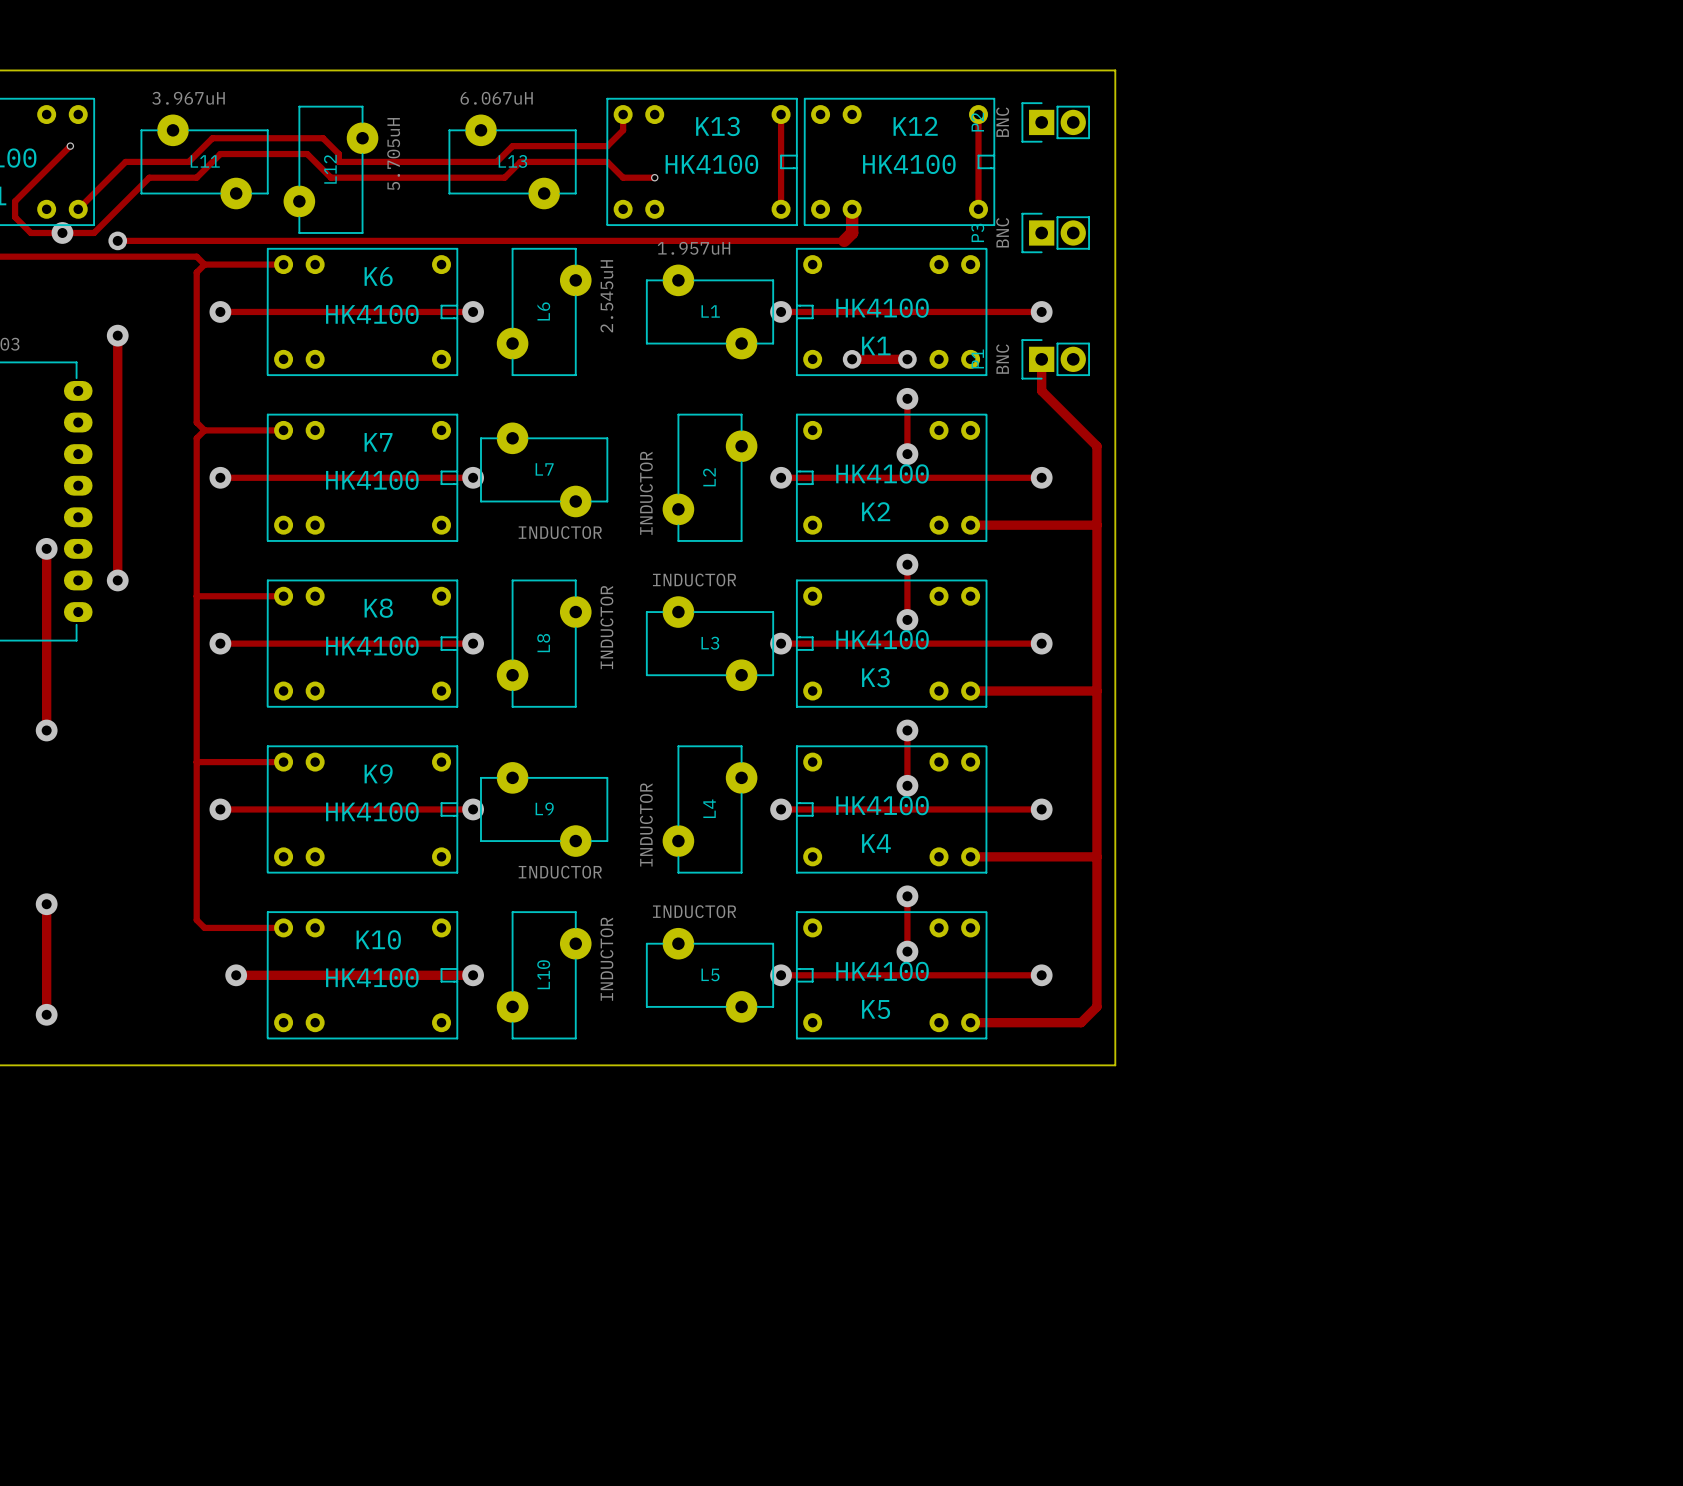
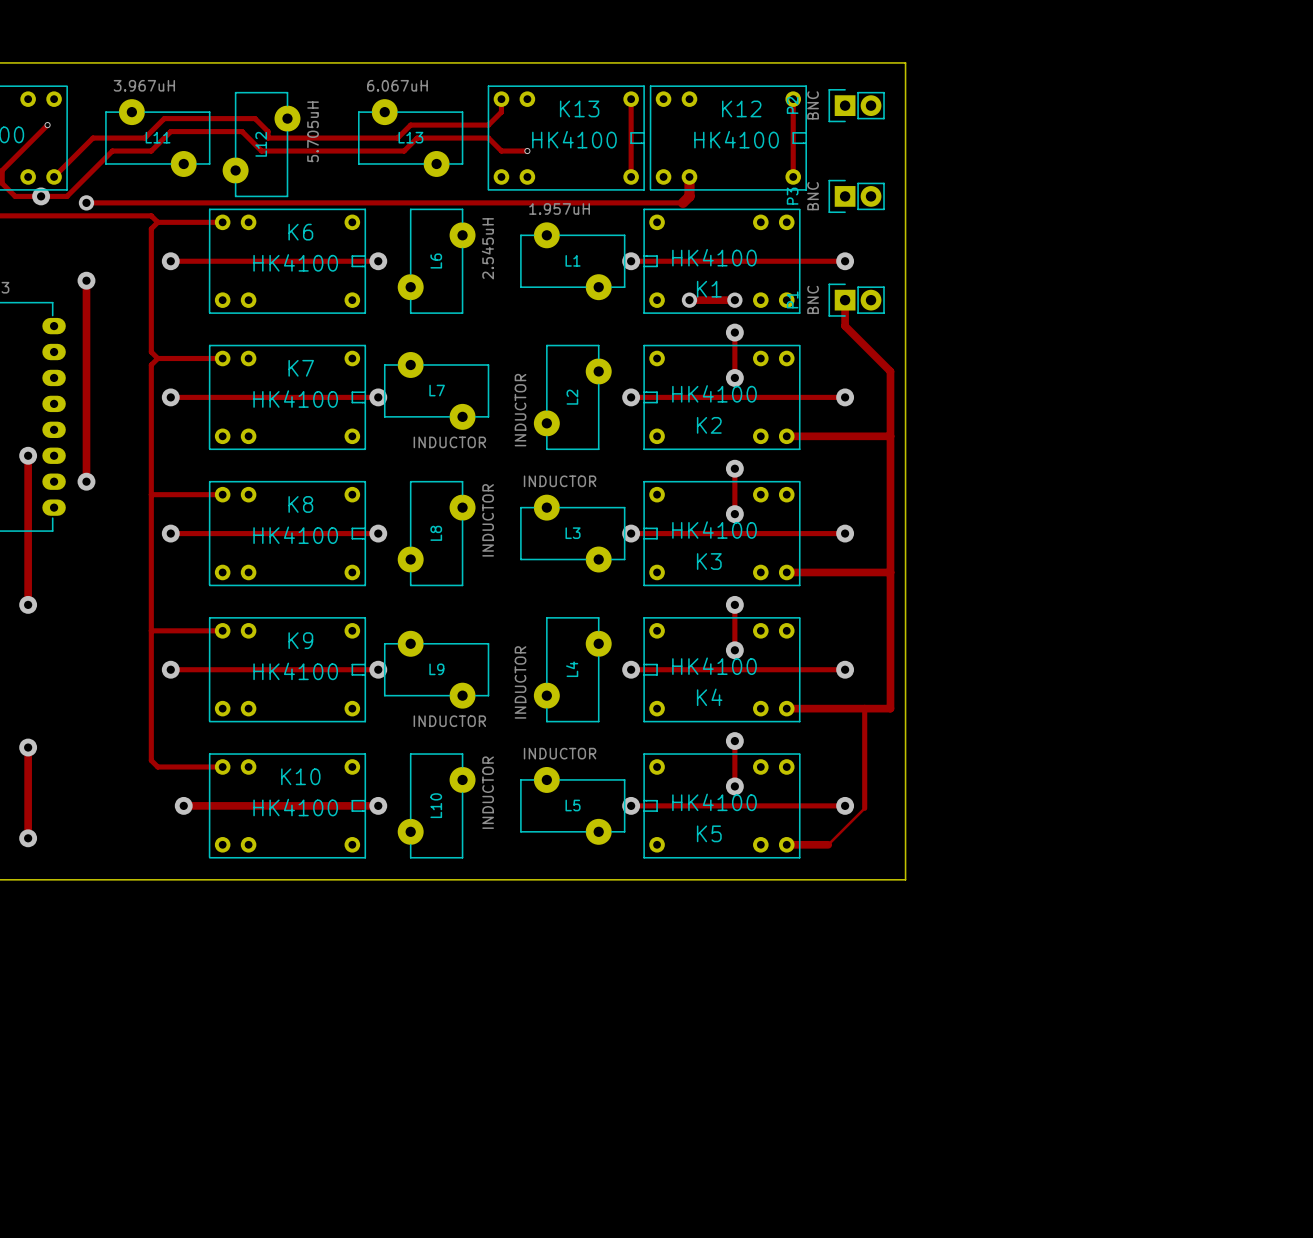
track: (1096, 856) (1096, 1006) (1081, 1022) (1021, 1022) -> (864, 708) (864, 808) (828, 844)

